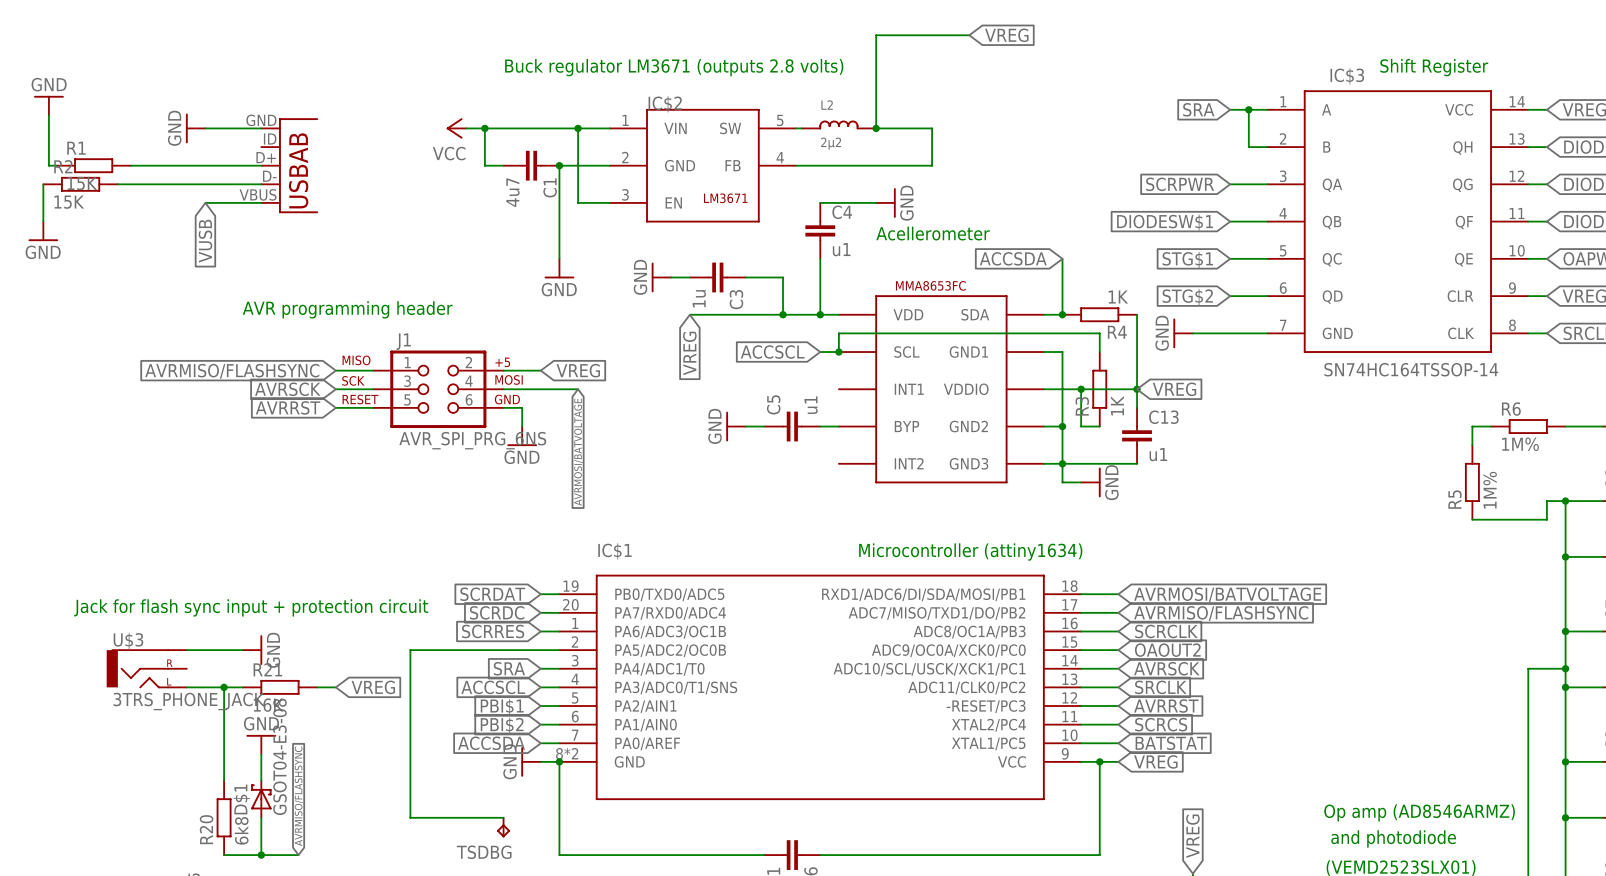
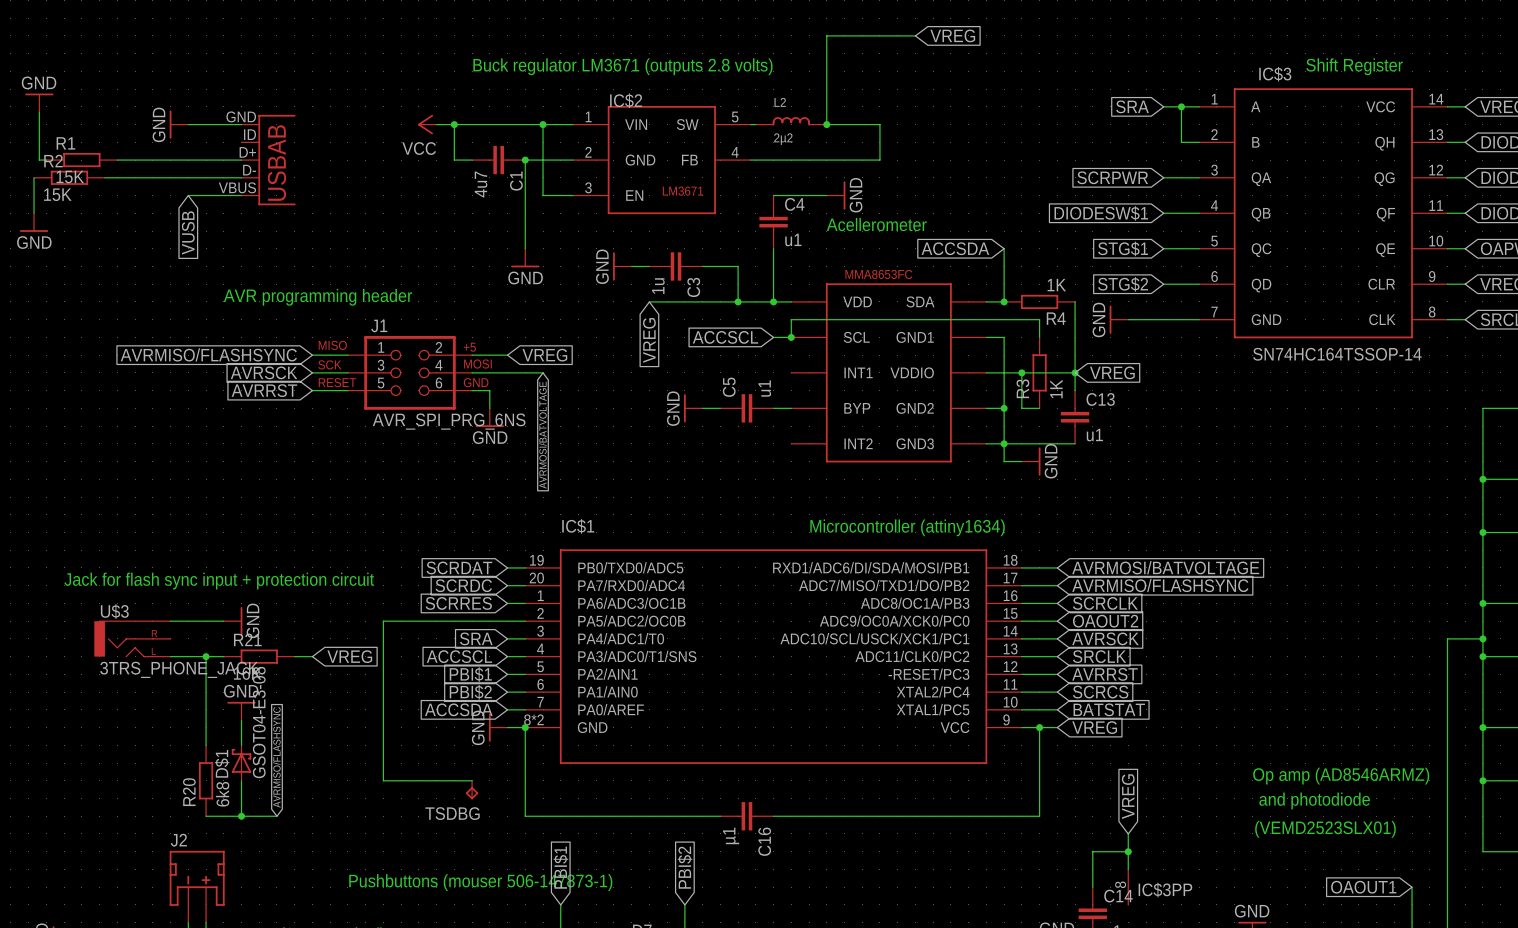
wire: (1491, 426) (1472, 426) (1472, 445) -> none
R6: 1M% (1528, 426) -> none
R5: 1M% (1472, 482) -> none
wire: (1565, 501) (1546, 501) (1546, 519) (1472, 519) -> (1482, 479) (1482, 408)

